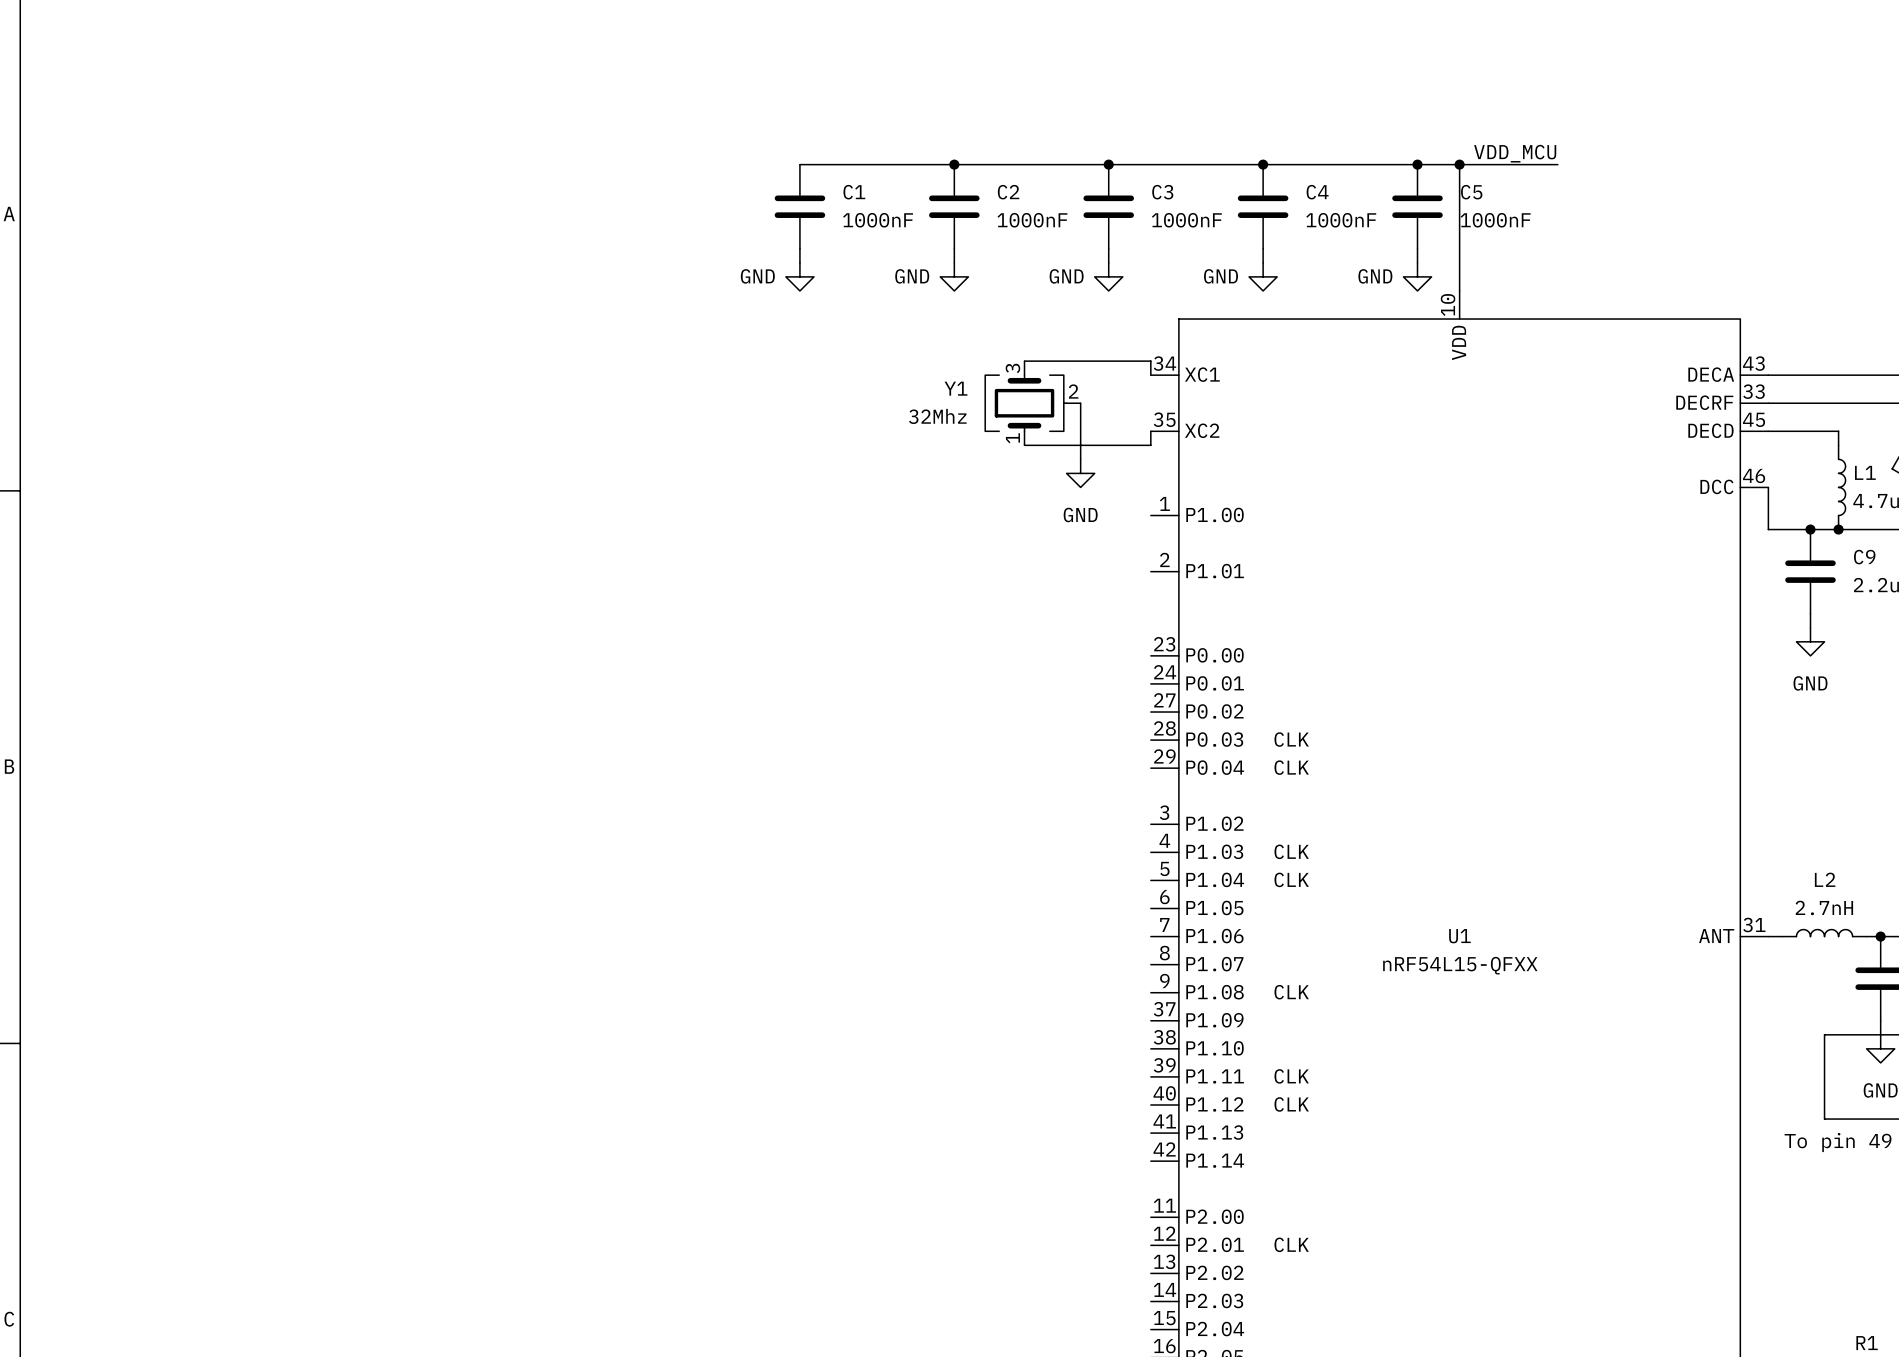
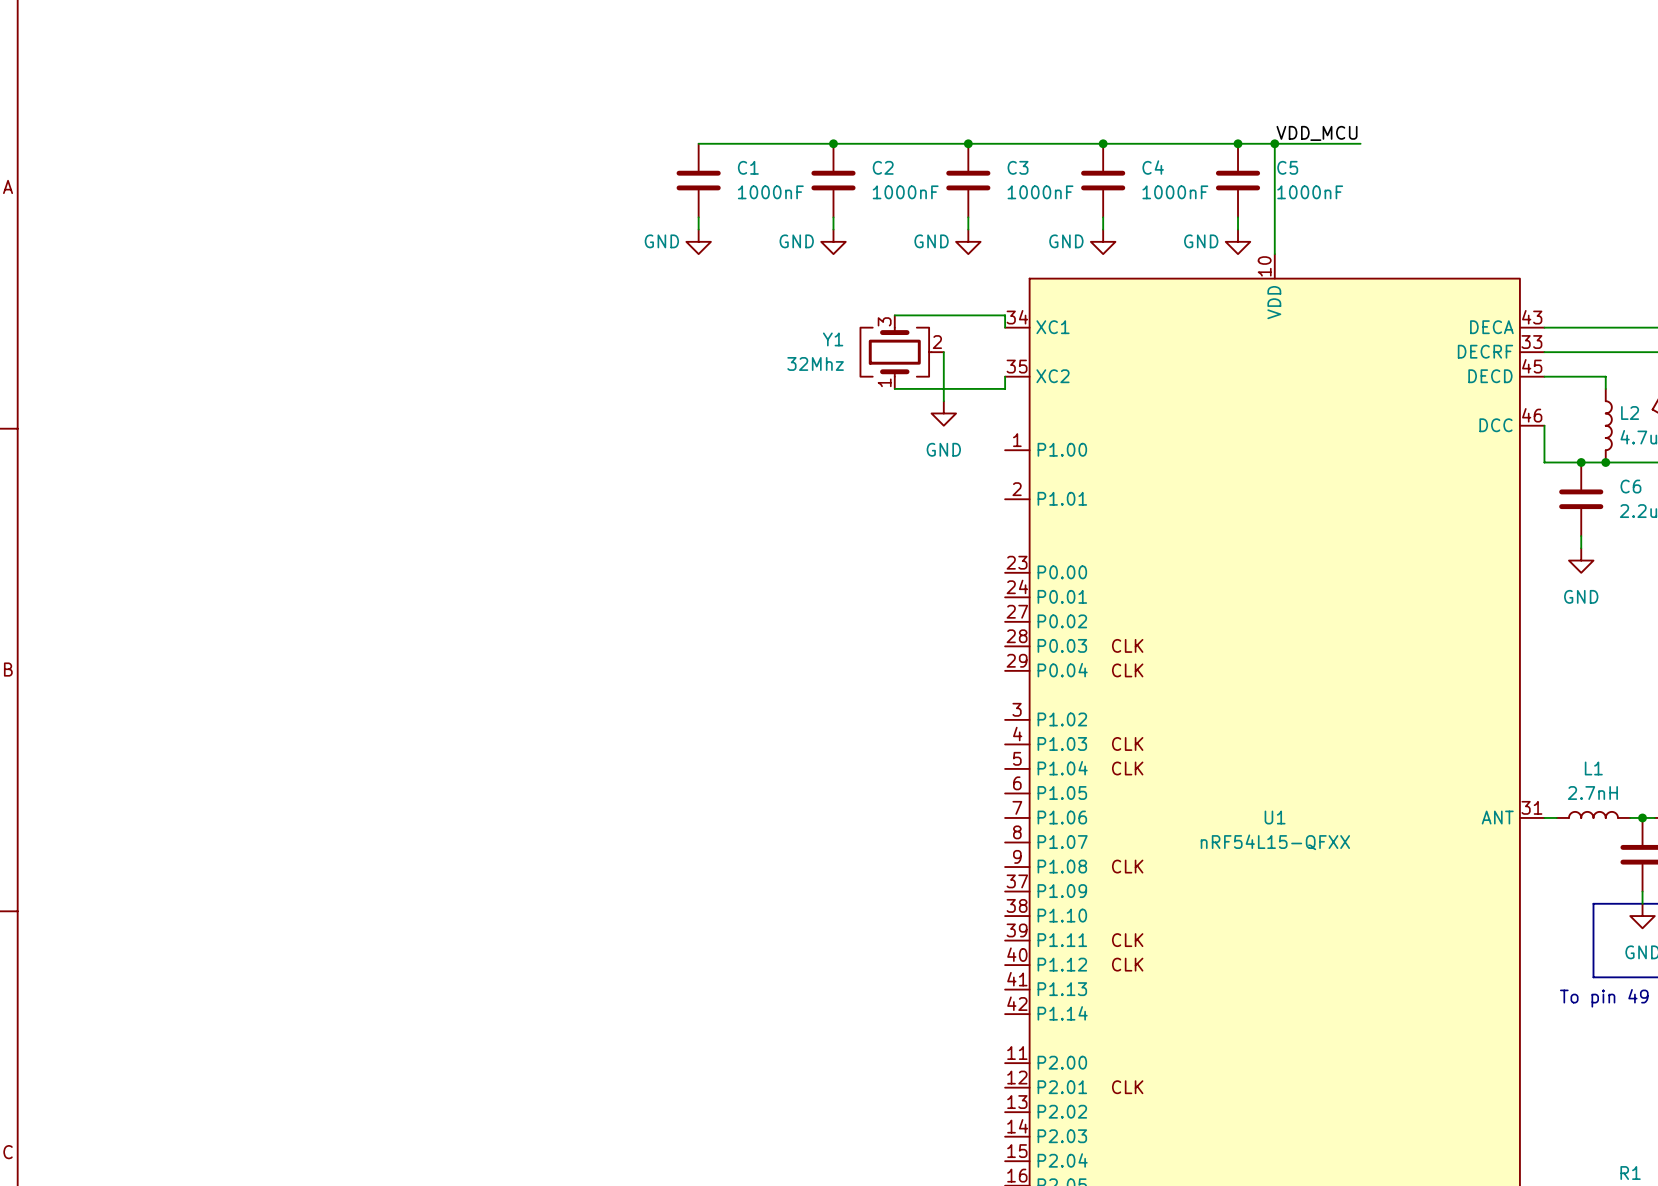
L1 name: L1 (1865, 472) -> L2 (1630, 413)
C9 name: C9 (1864, 557) -> C6 (1630, 486)
L2 name: L2 (1825, 879) -> L1 (1593, 768)

